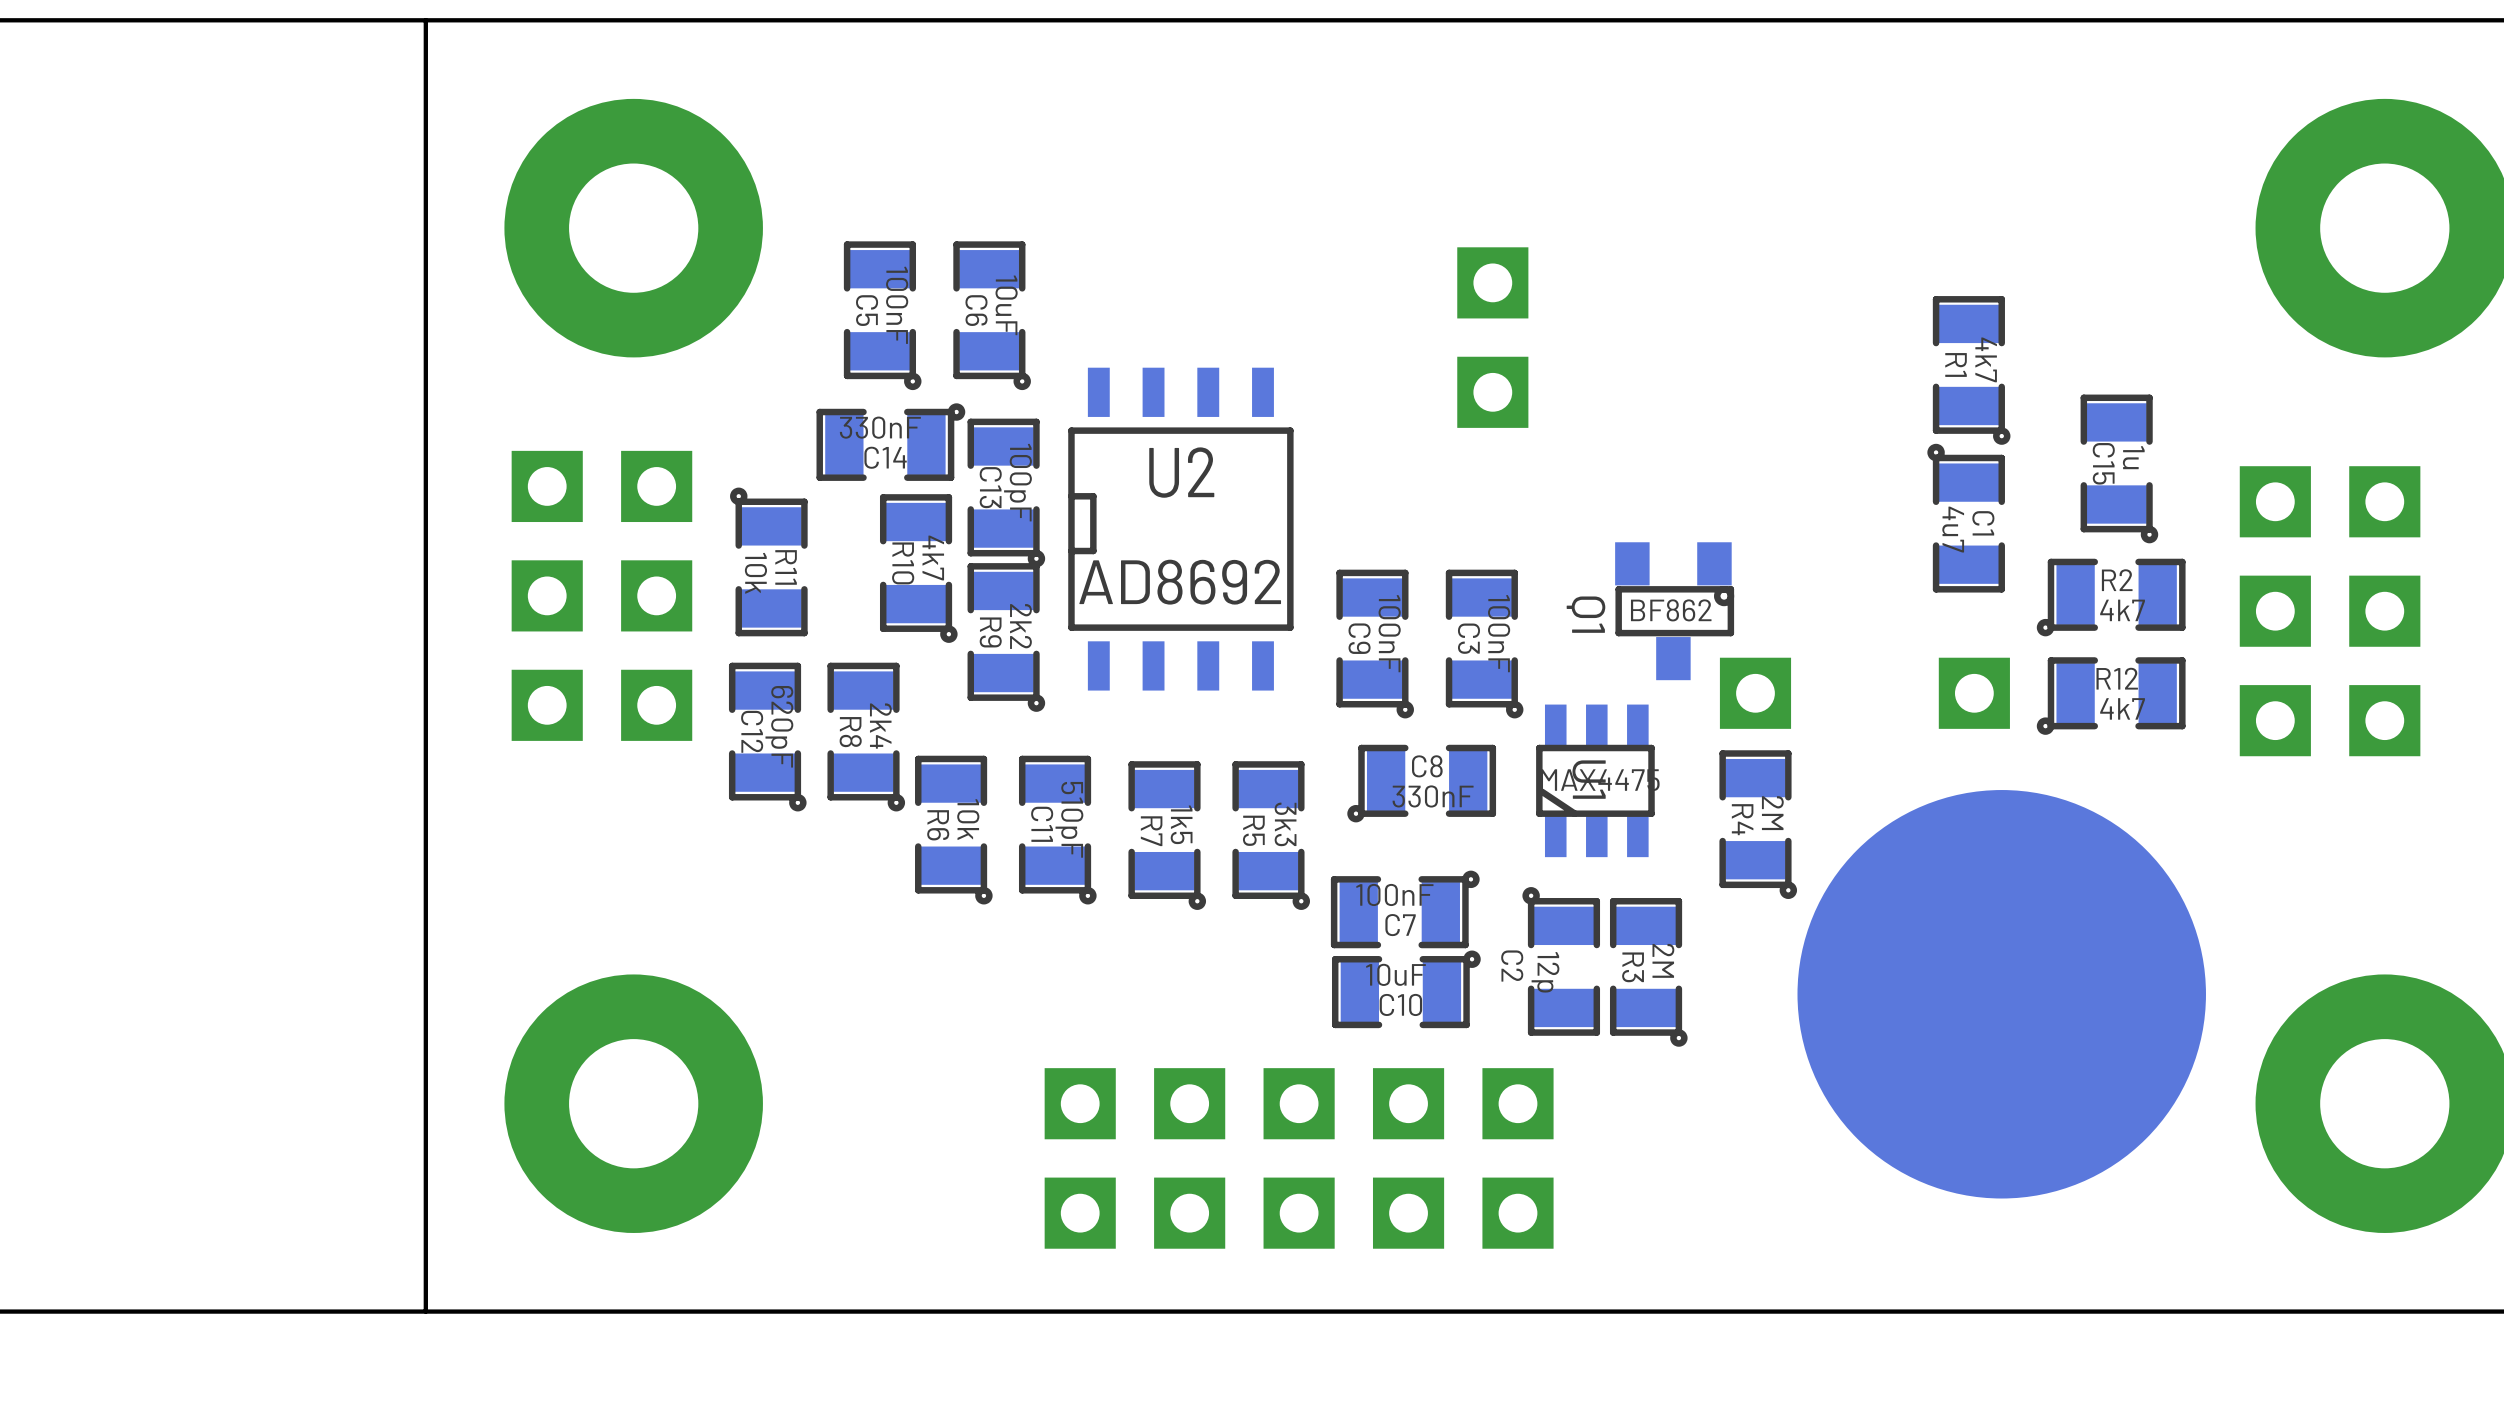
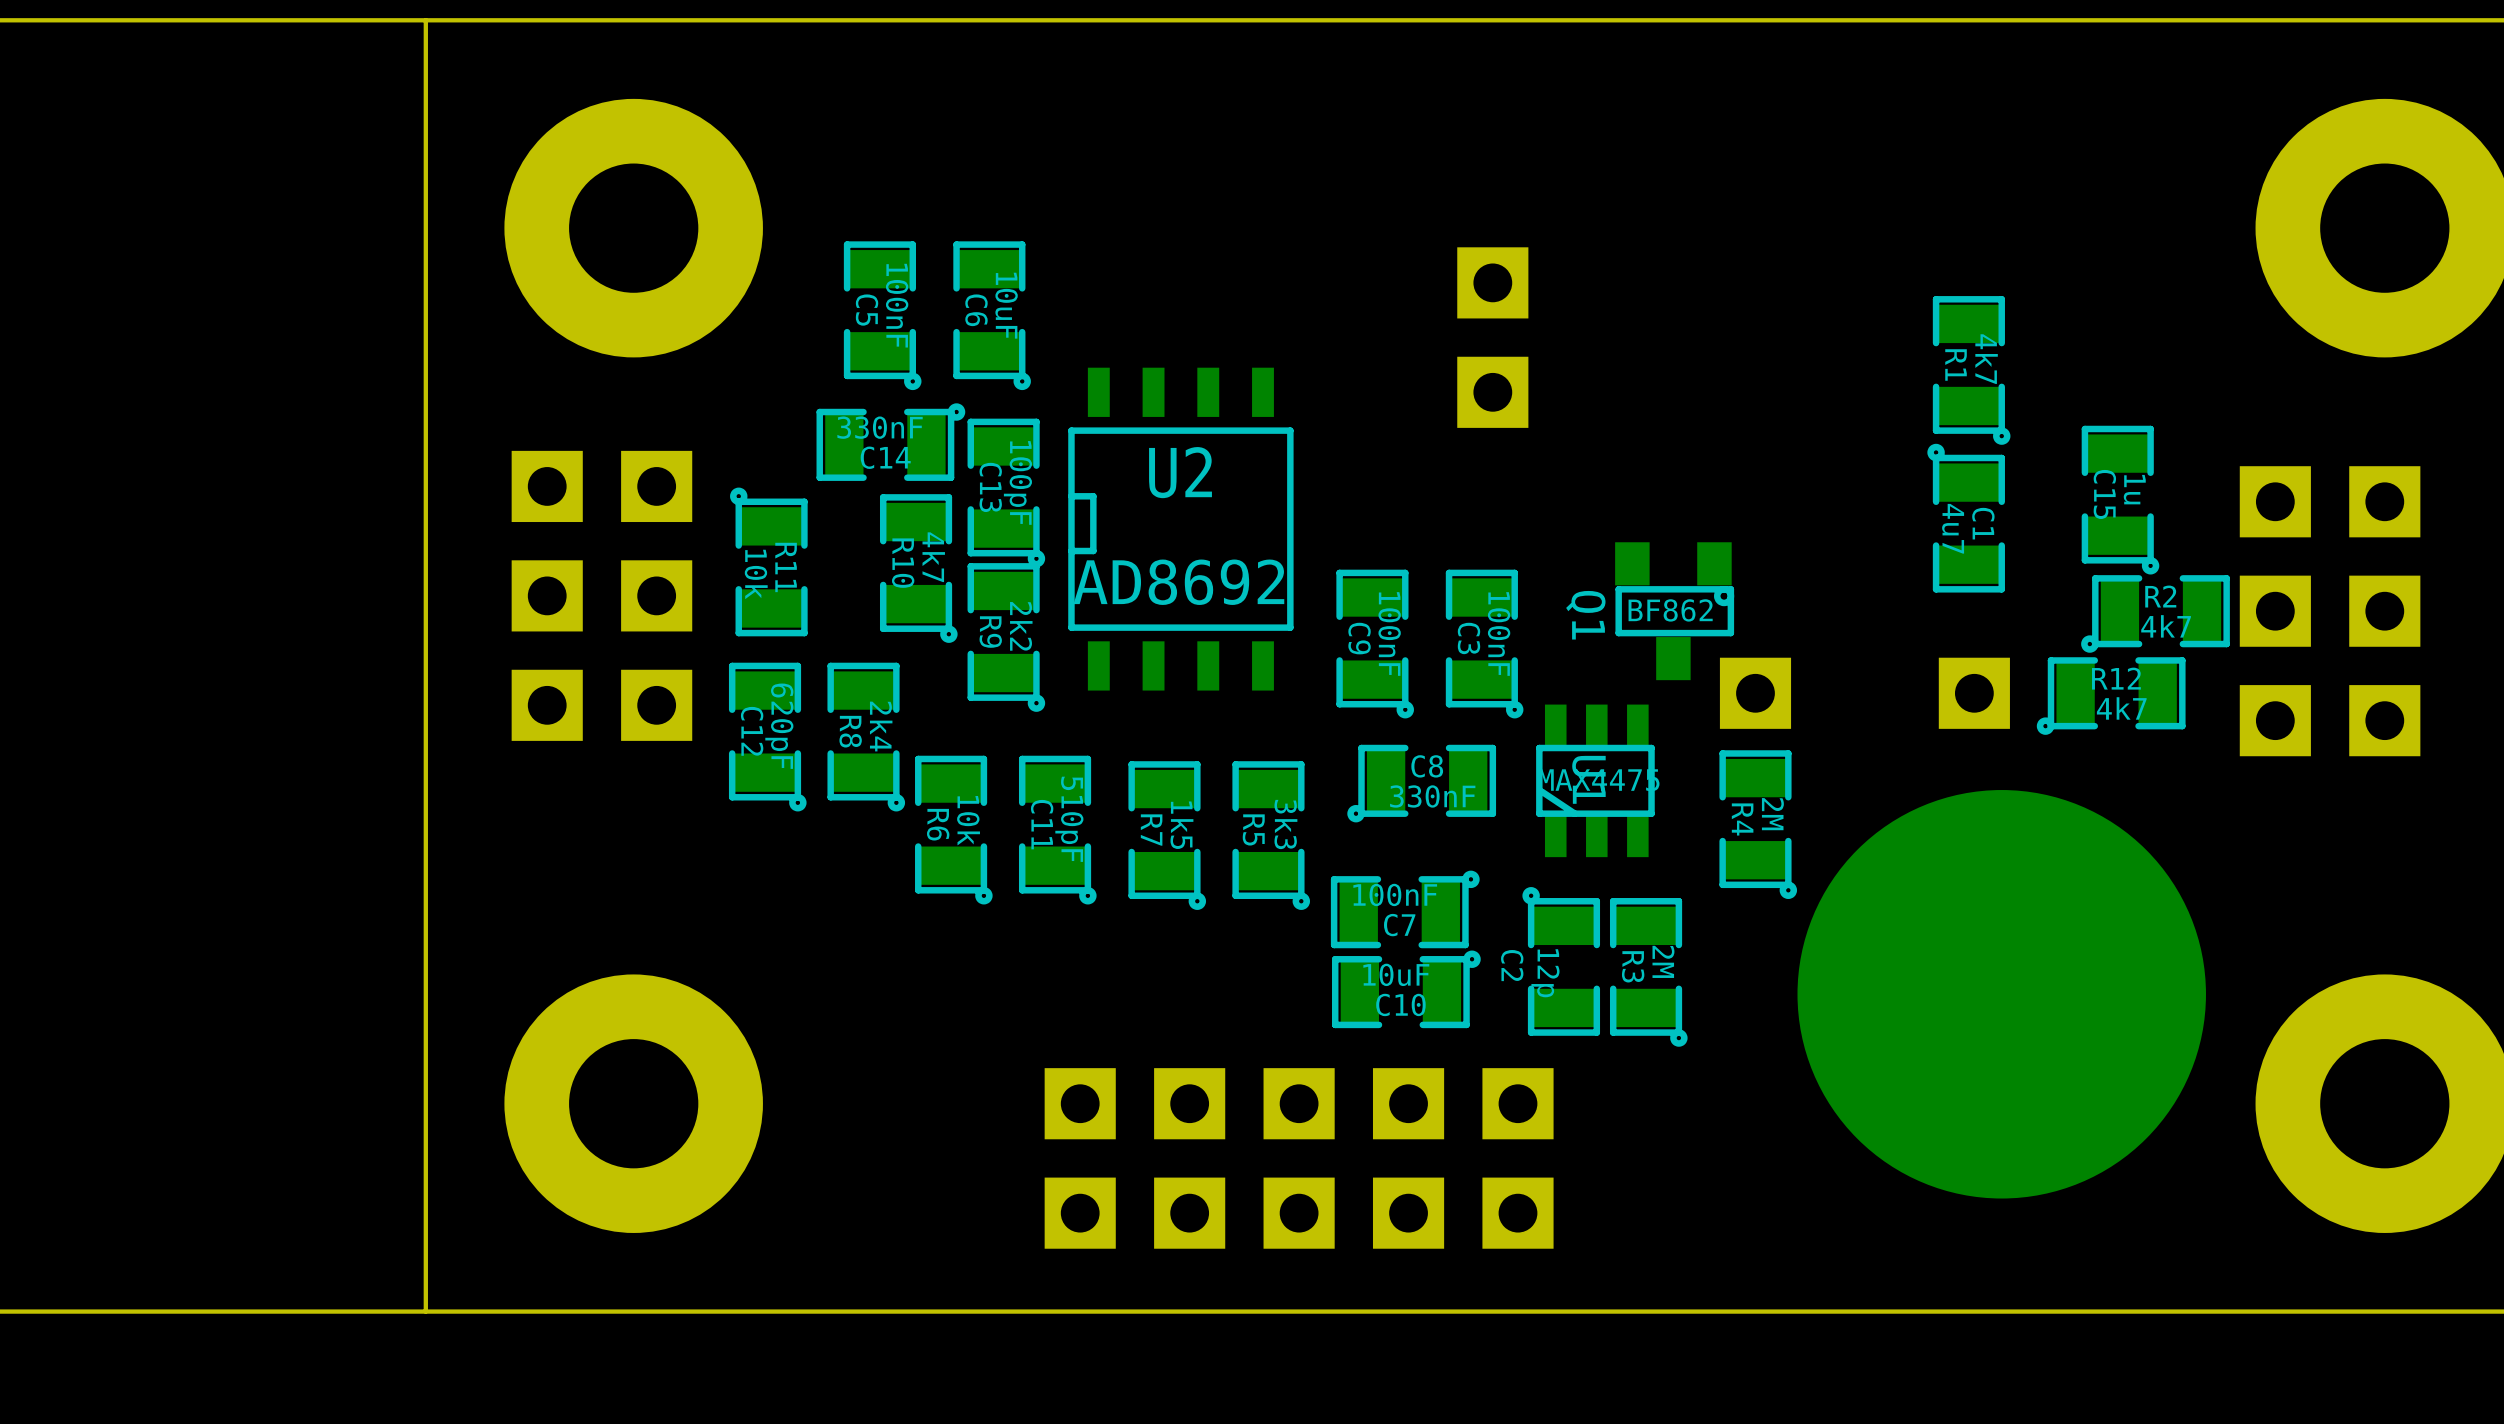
C15 position: (2119, 468) -> (2120, 500)
R2 position: (2111, 597) -> (2155, 613)

